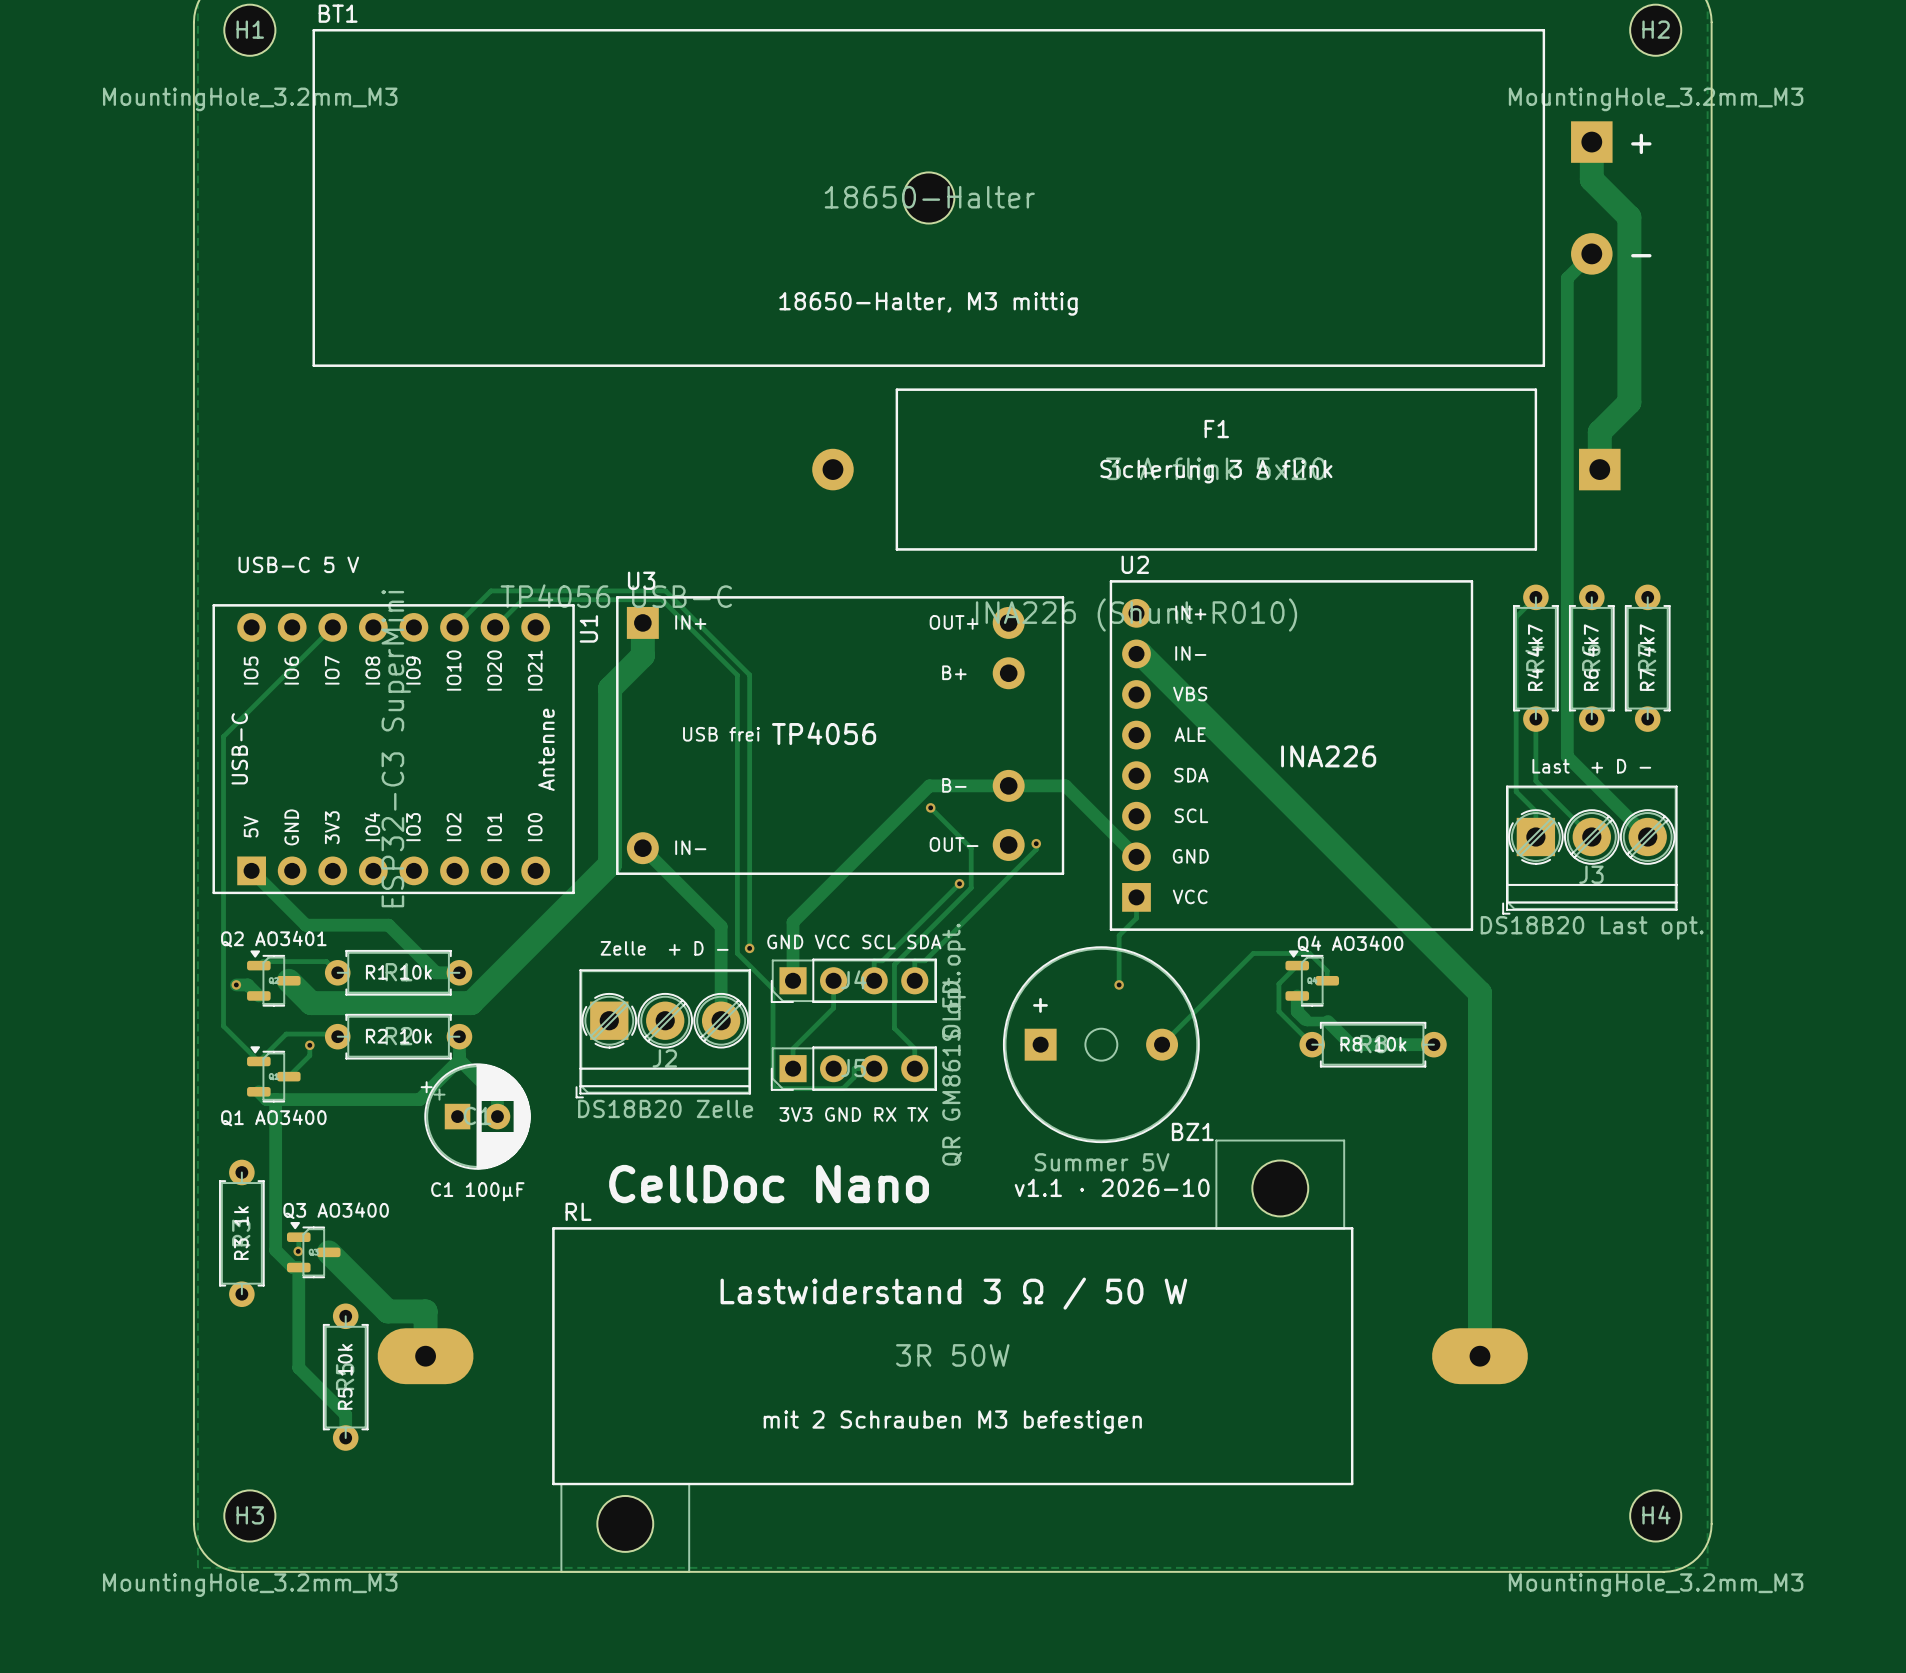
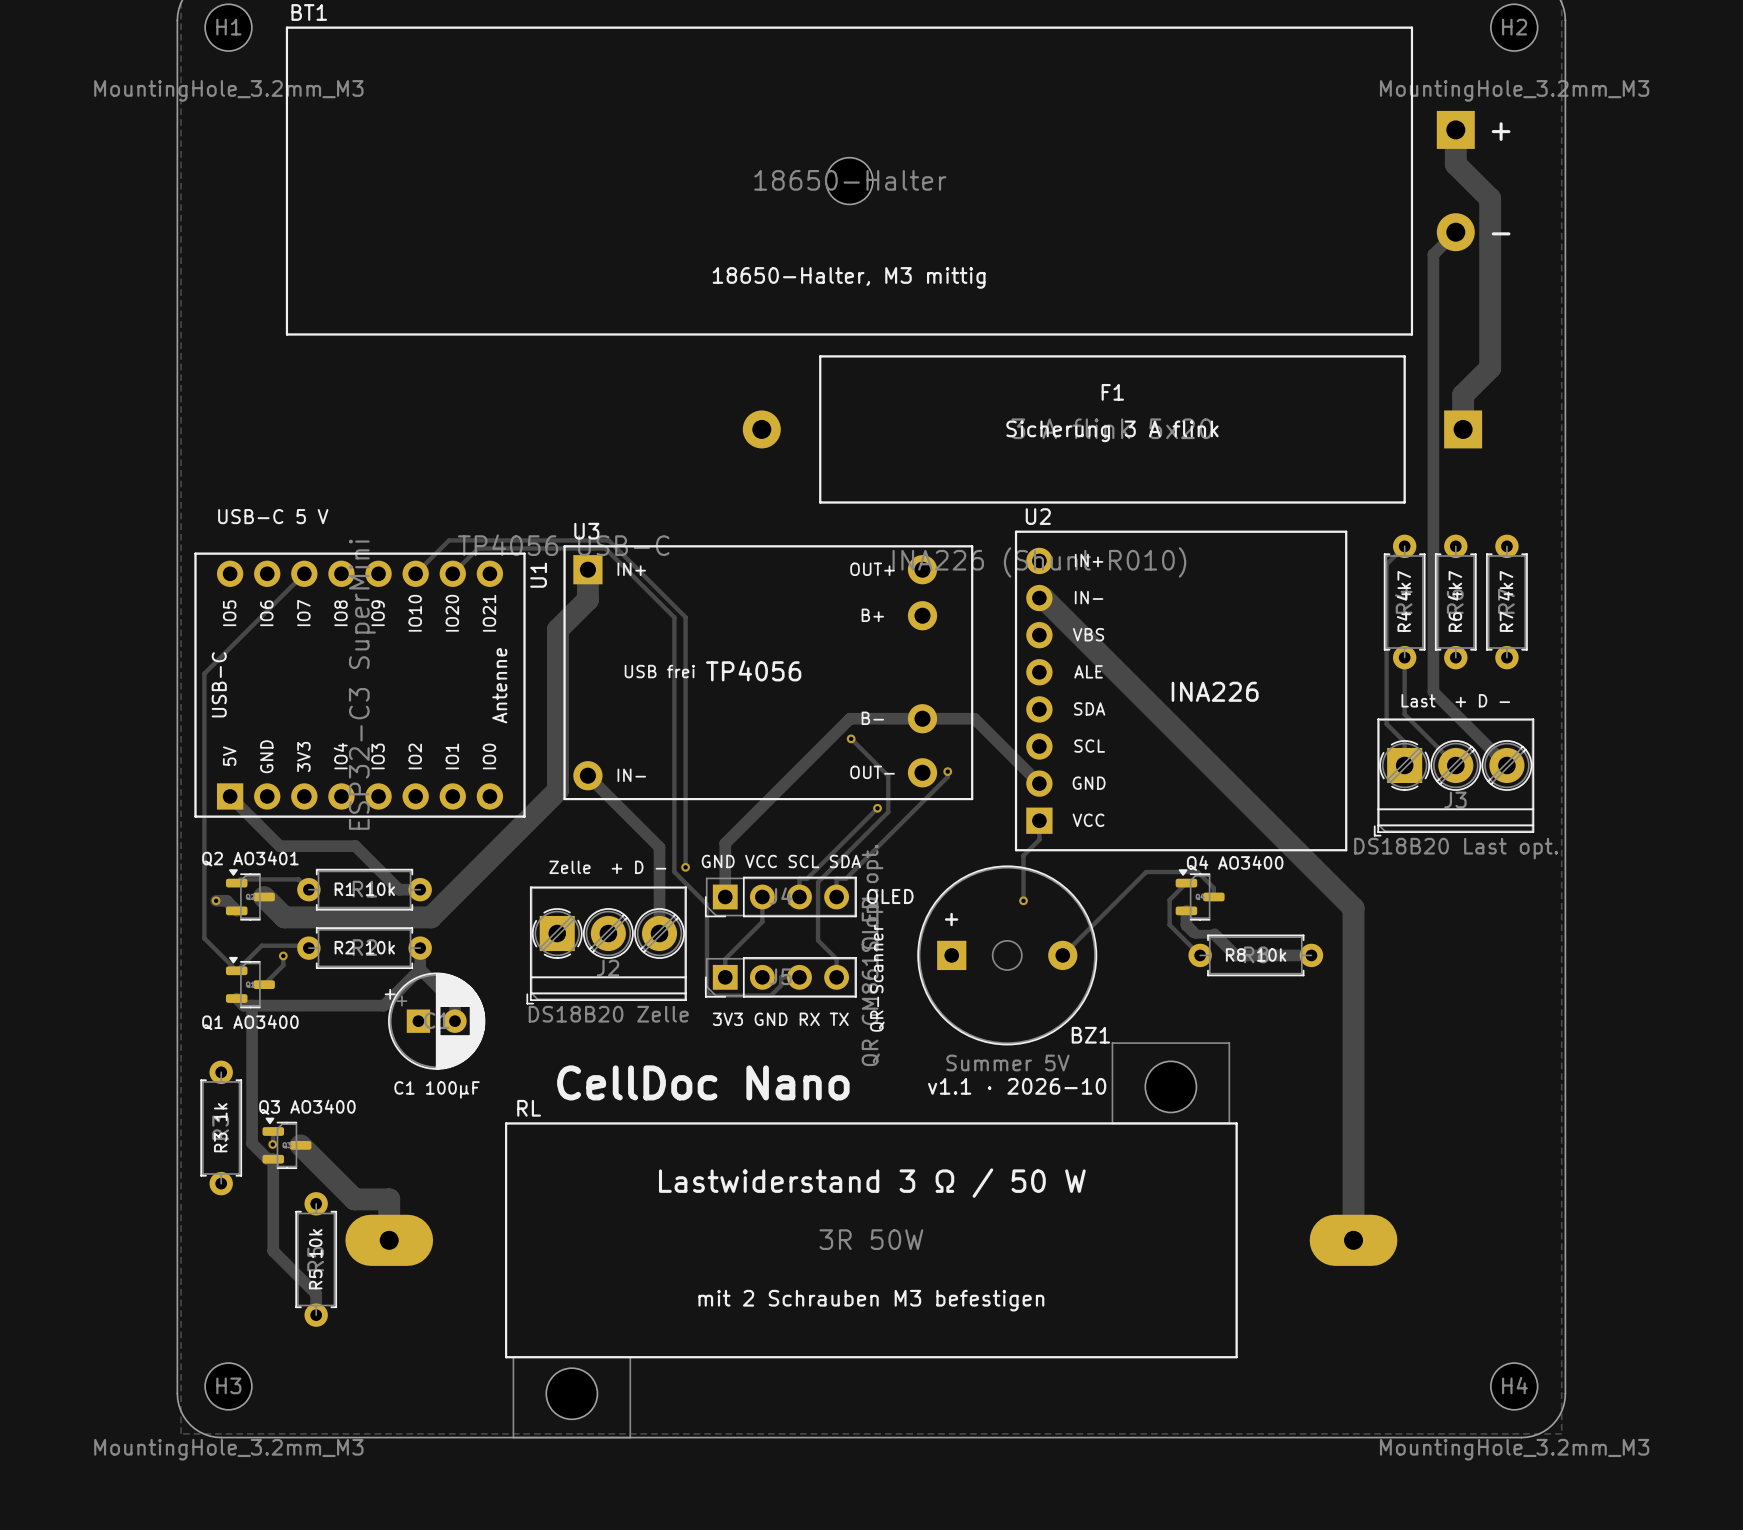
text: none -> OLED (890, 896)
text: none -> QR-Scanner (877, 978)

